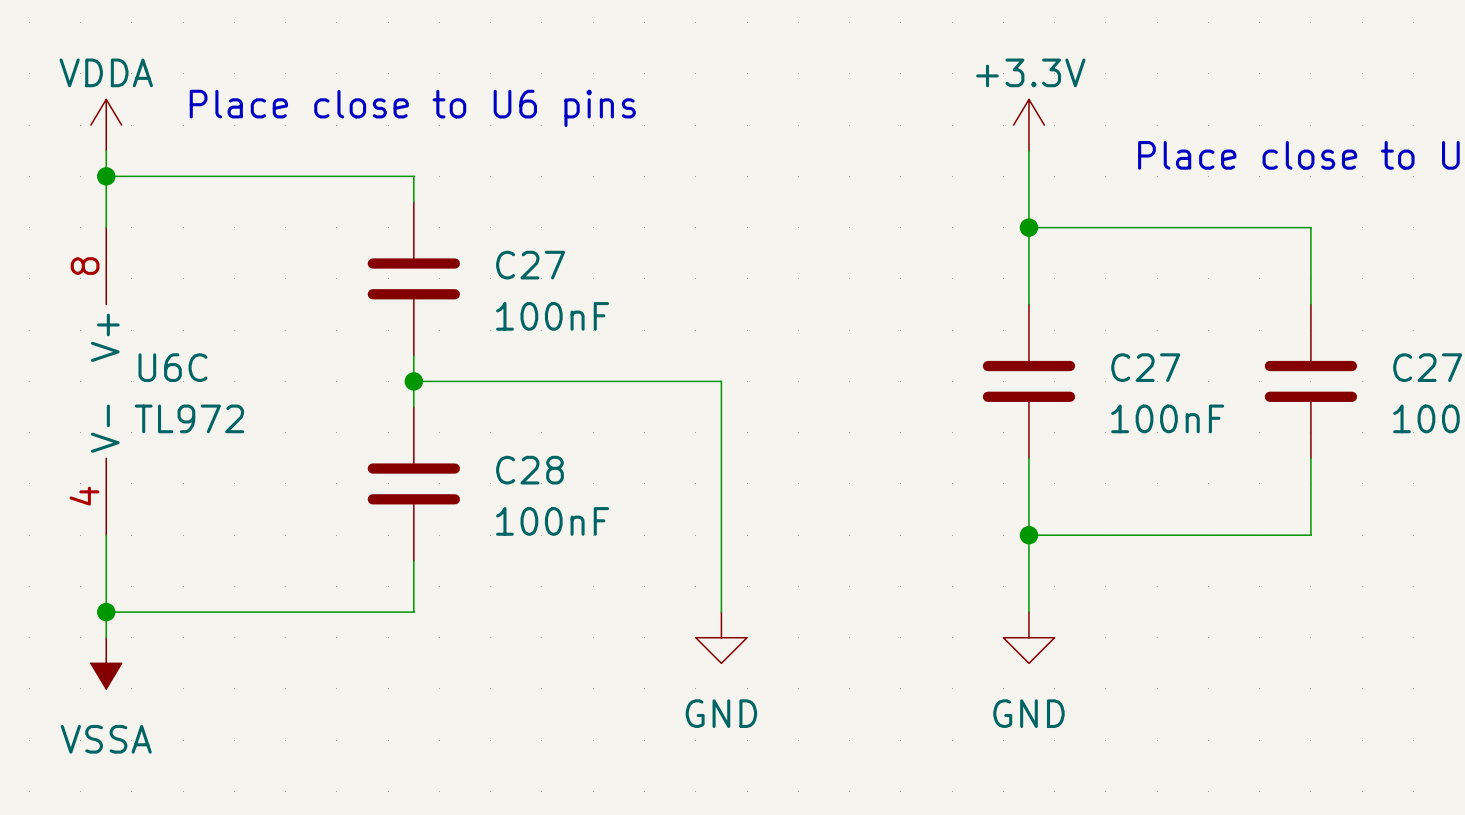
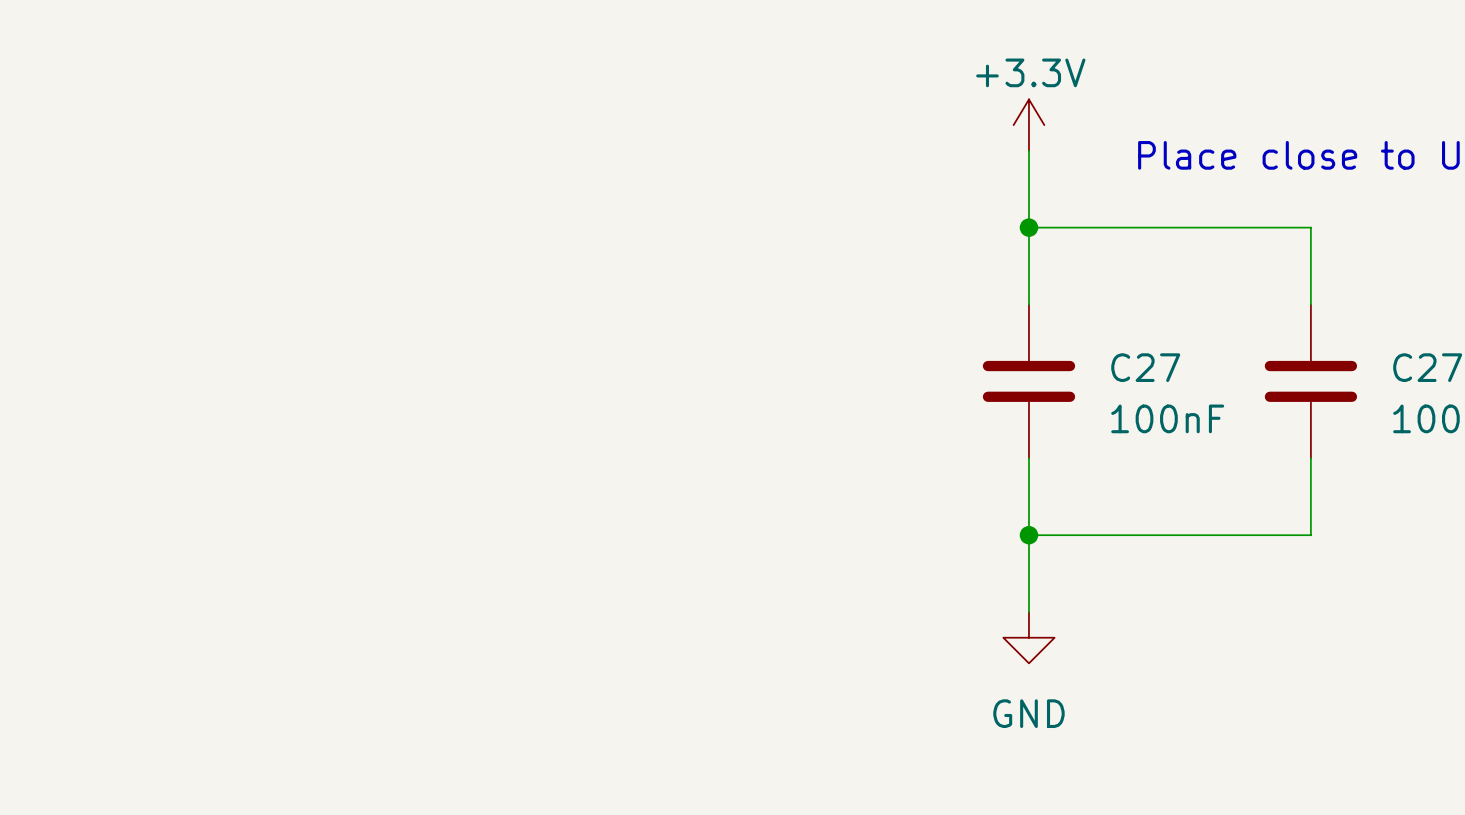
text: Place close to U6 pins (412, 108) -> none
power symbol: VDDA (106, 125) -> none
wire: (106, 150) (106, 227) -> none
wire: (106, 176) (413, 176) (413, 201) -> none
junction: (106, 176) -> none
C27: 100nF (413, 278) -> none
wire: (413, 355) (413, 407) -> none
U6C: TL972 (106, 381) -> none
wire: (413, 381) (721, 381) (721, 612) -> none
junction: (413, 381) -> none
C28: 100nF (413, 483) -> none
wire: (106, 535) (106, 637) -> none
wire: (413, 560) (413, 612) (106, 612) -> none
junction: (106, 612) -> none
power symbol: GND (721, 637) -> none
power symbol: VSSA (106, 663) -> none

